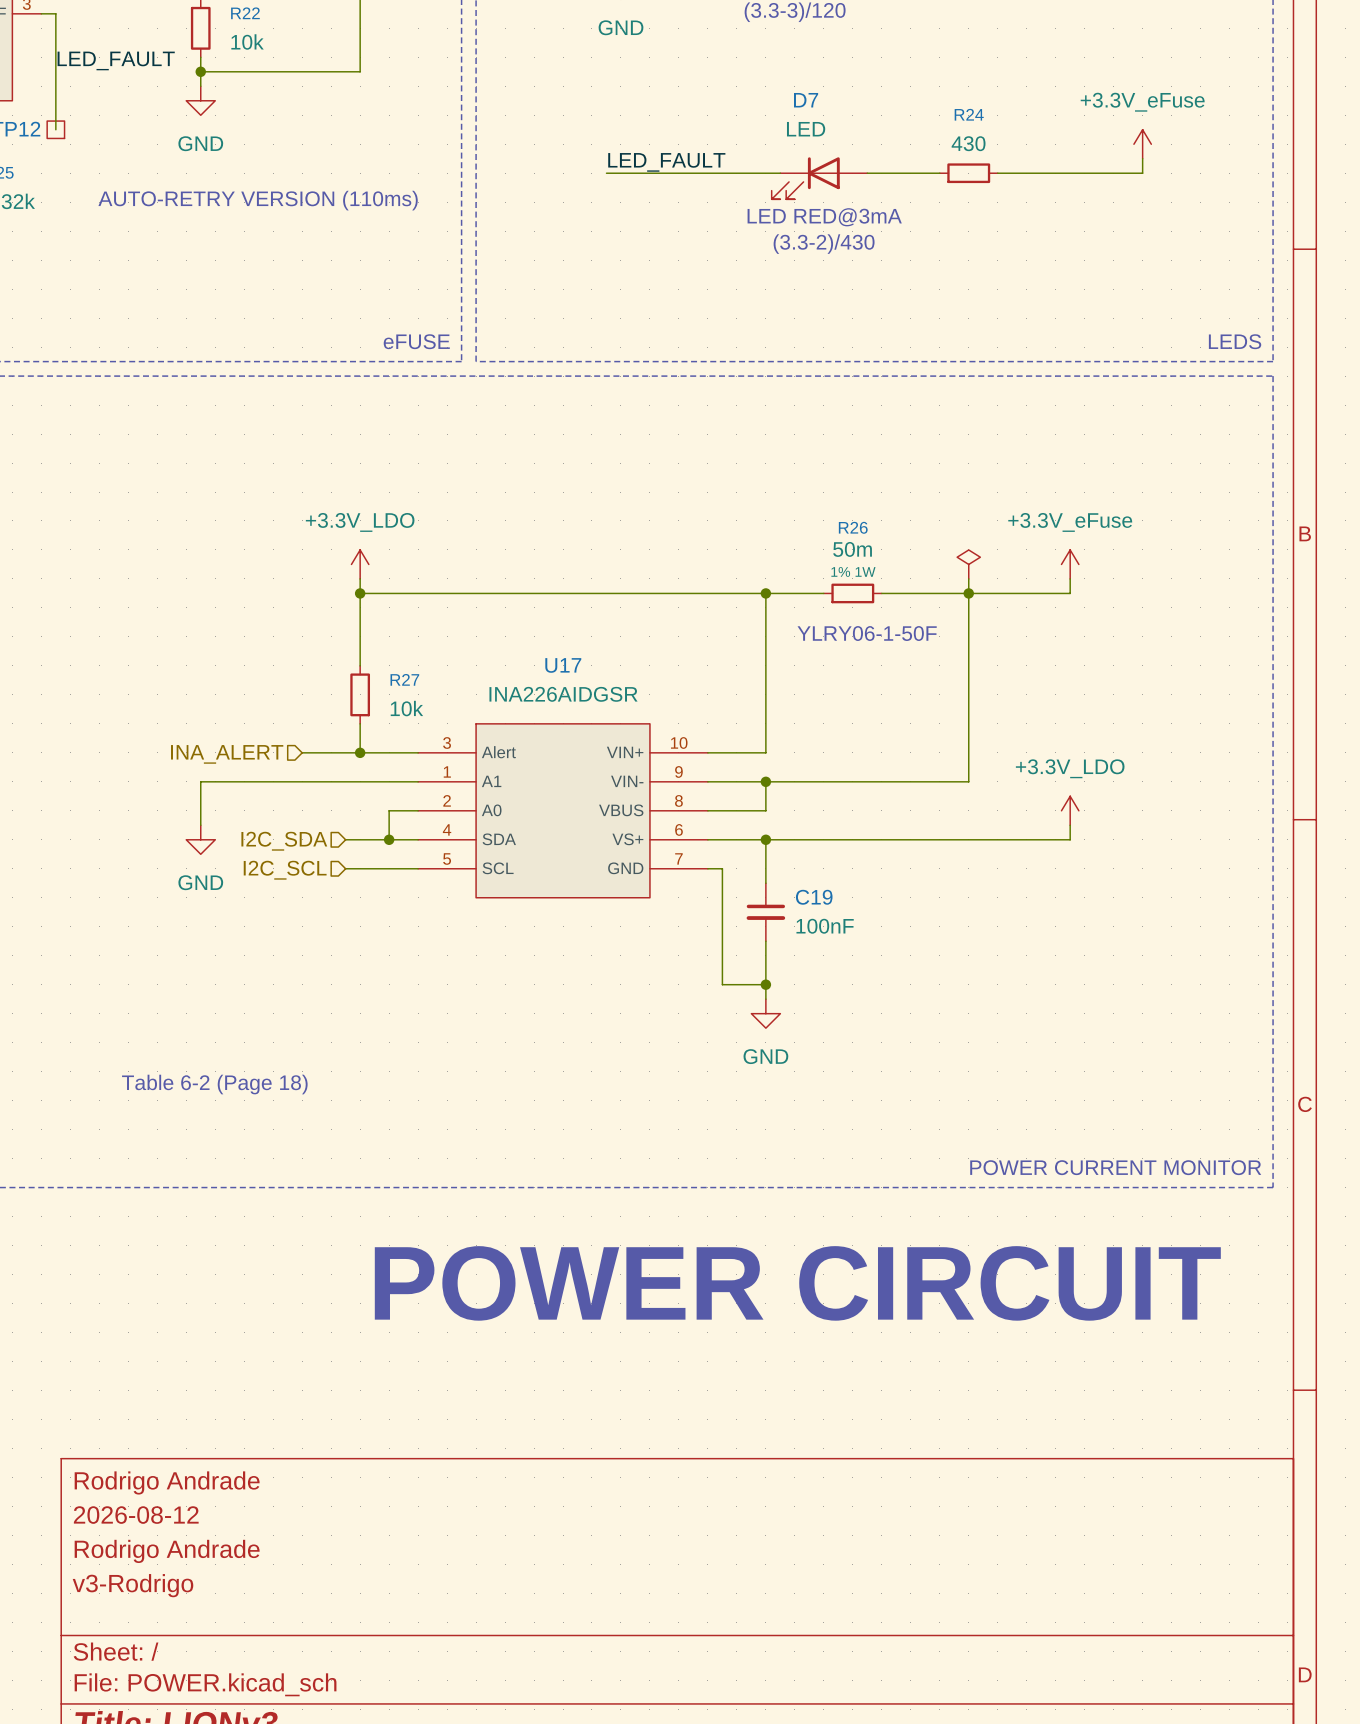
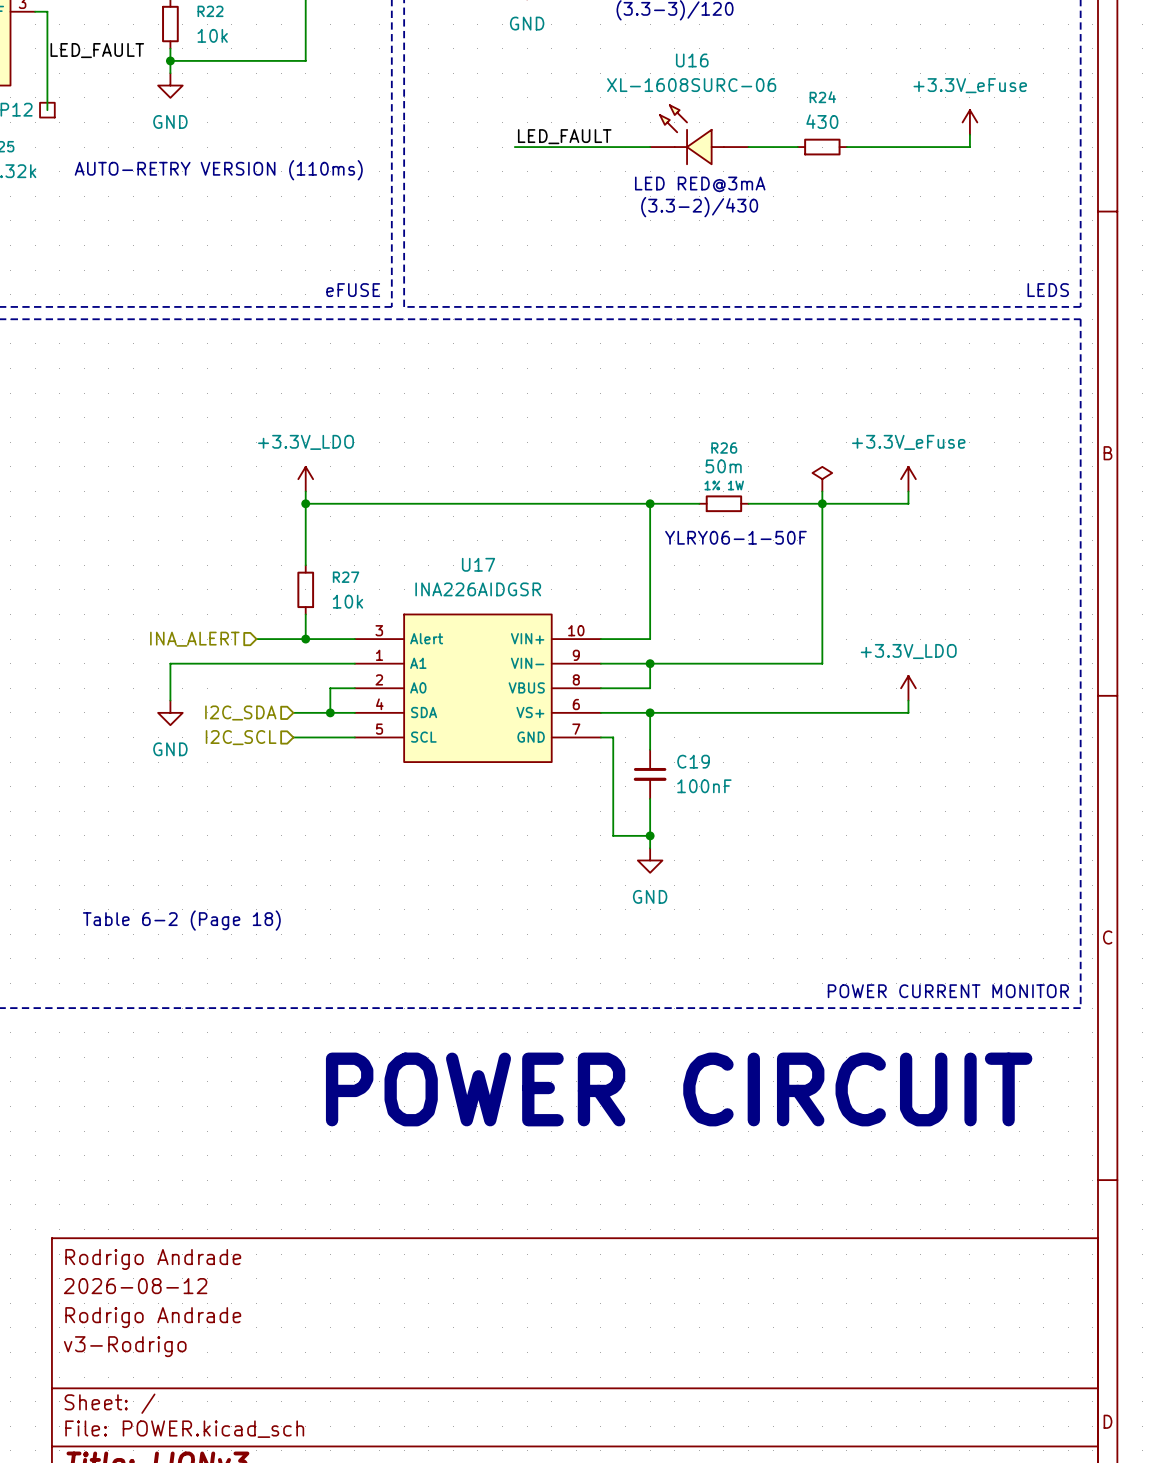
U16: none -> XL-1608SURC-06 (699, 134)
D7: LED (819, 178) -> none

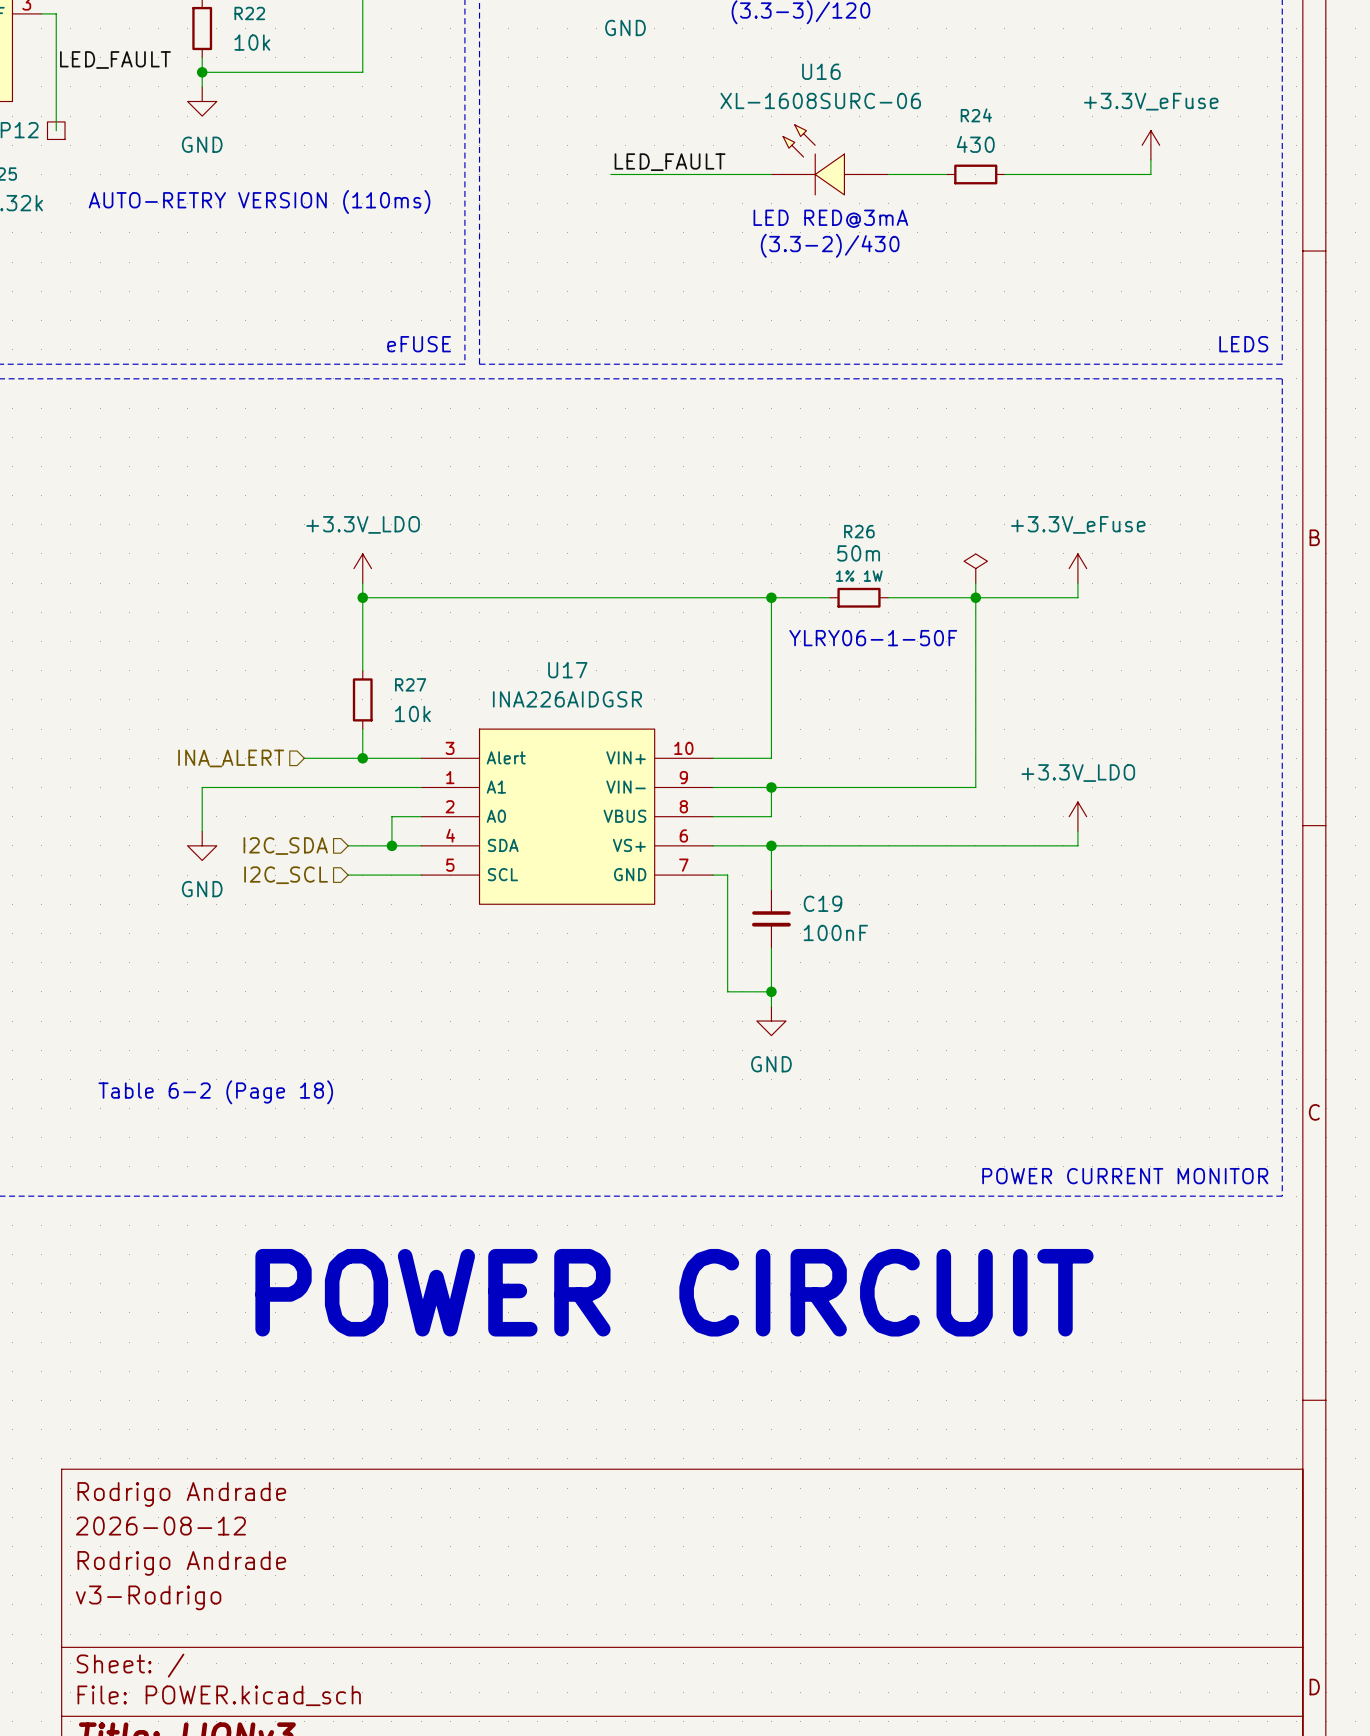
text position: POWER CIRCUIT (679, 1089) -> POWER CIRCUIT (674, 1292)

